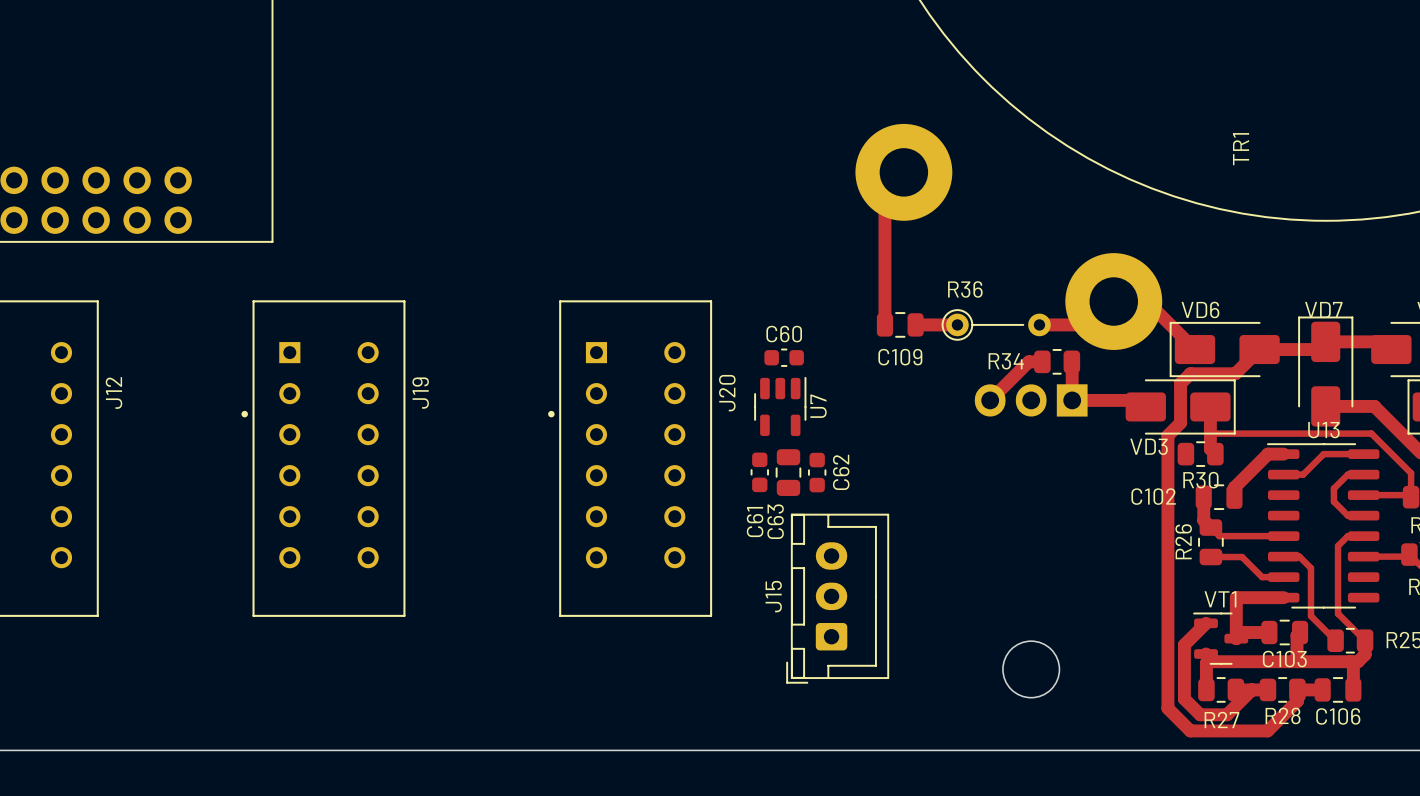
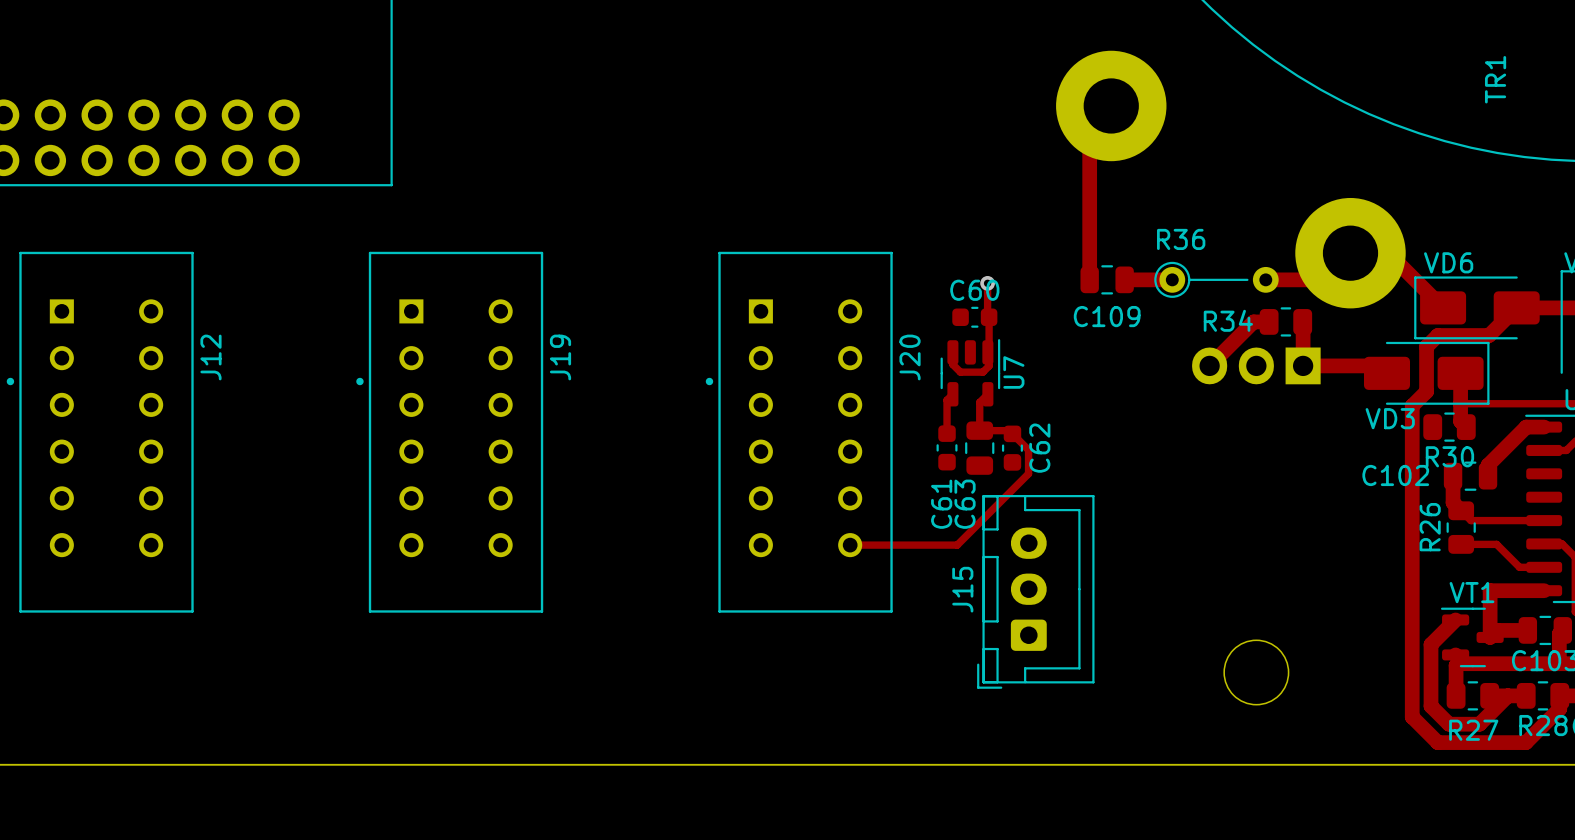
track: none -> (987, 283) (989, 366) (982, 372) (960, 372) (952, 364) (952, 352)
via: none -> (987, 283)
track: none -> (952, 394) (947, 400) (947, 433)
track: none -> (987, 394) (979, 402) (979, 430) (1009, 430) (1028, 449) (1028, 473) (957, 545) (850, 545)

